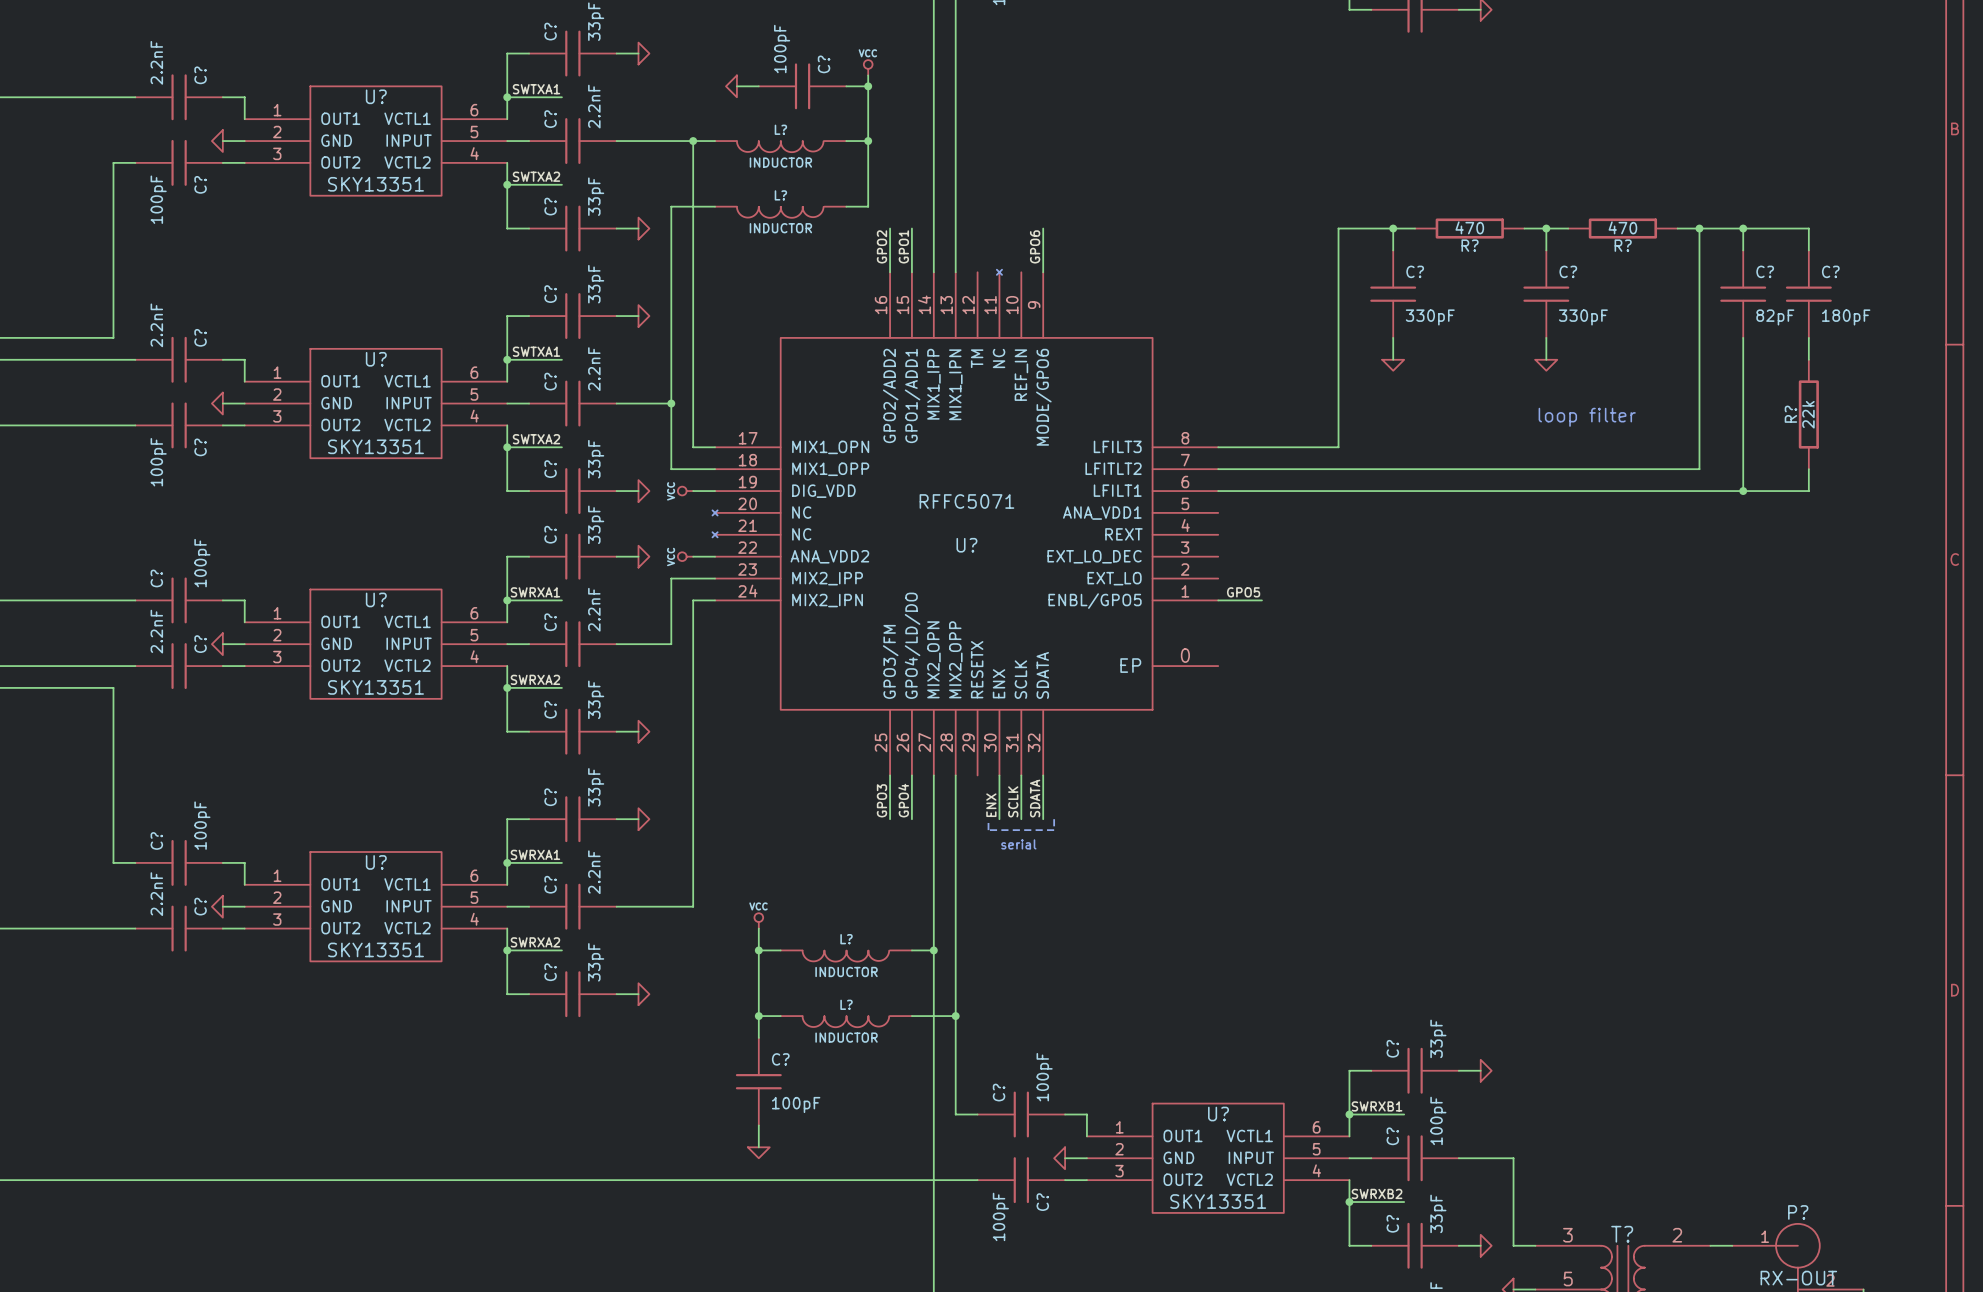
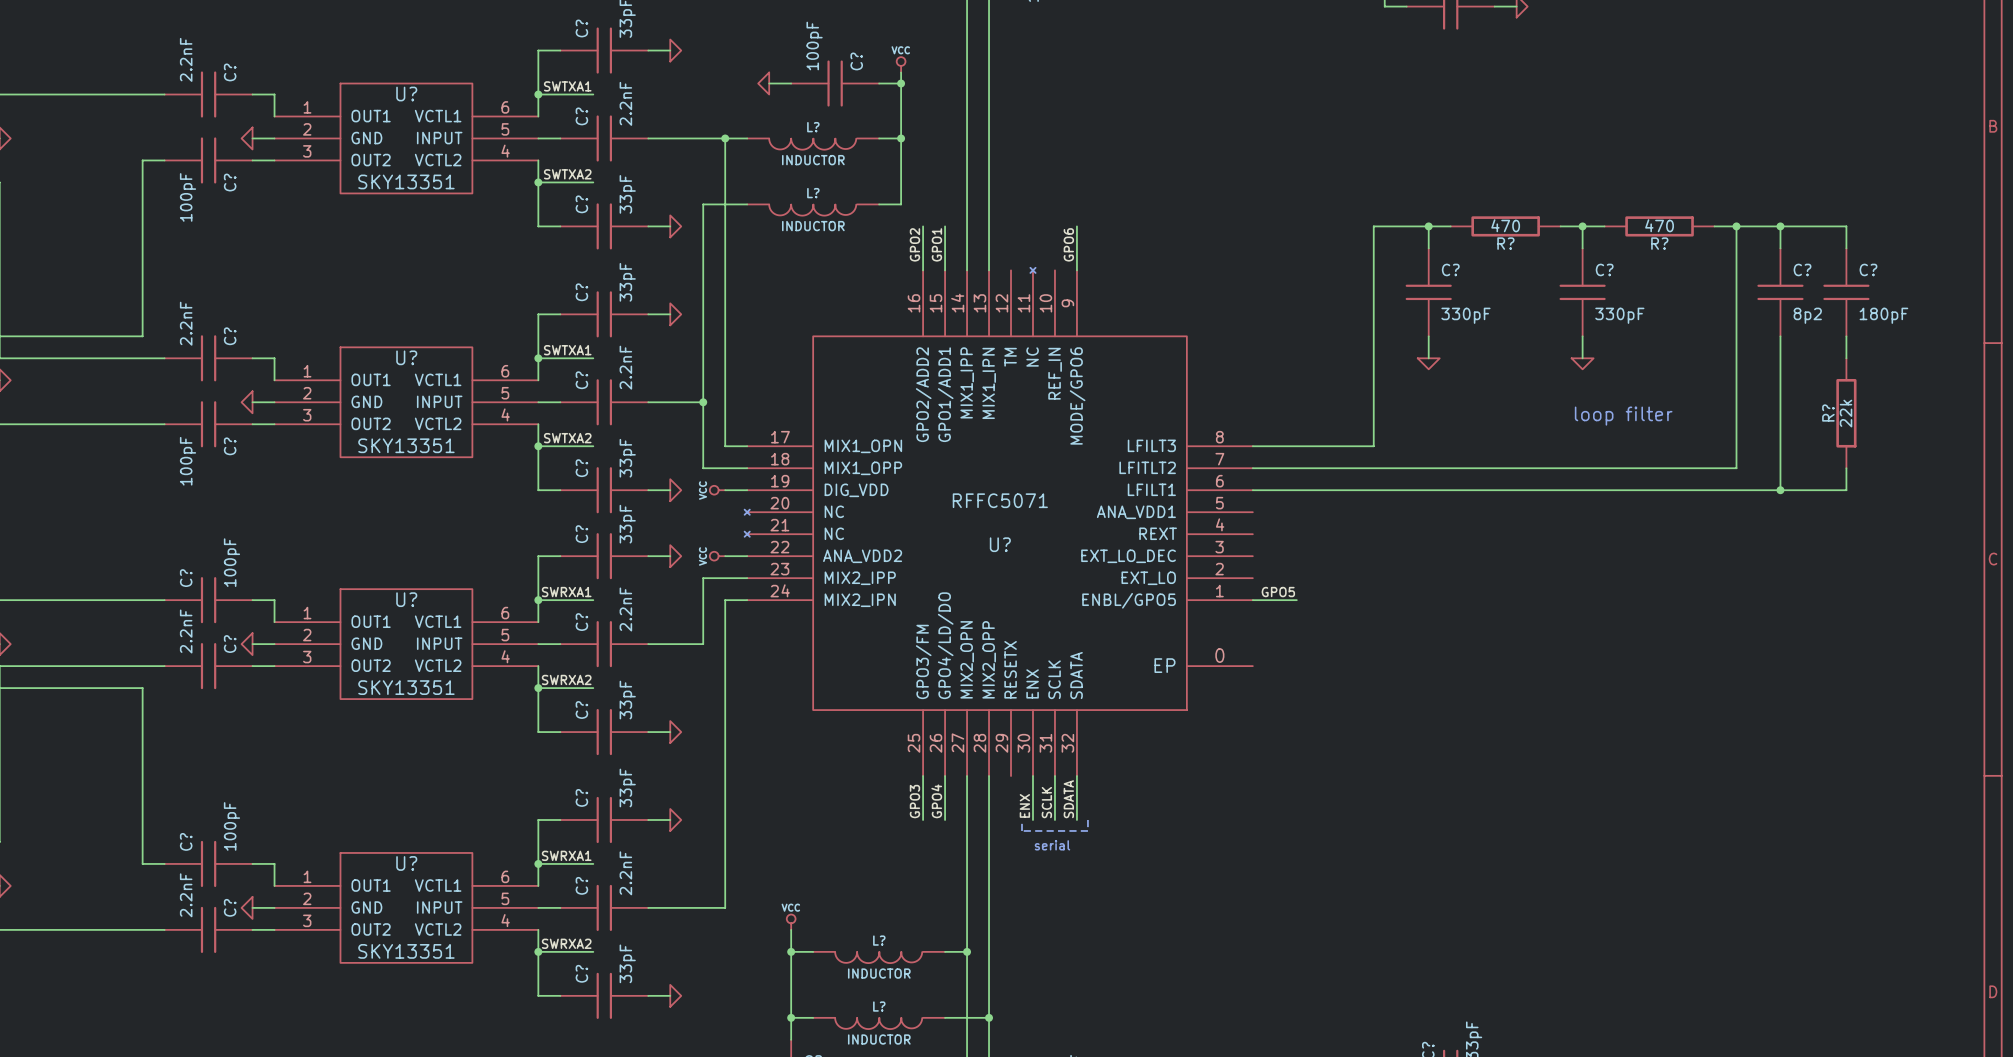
C? value: 82pF (1775, 317) -> 8p2 (1807, 315)

